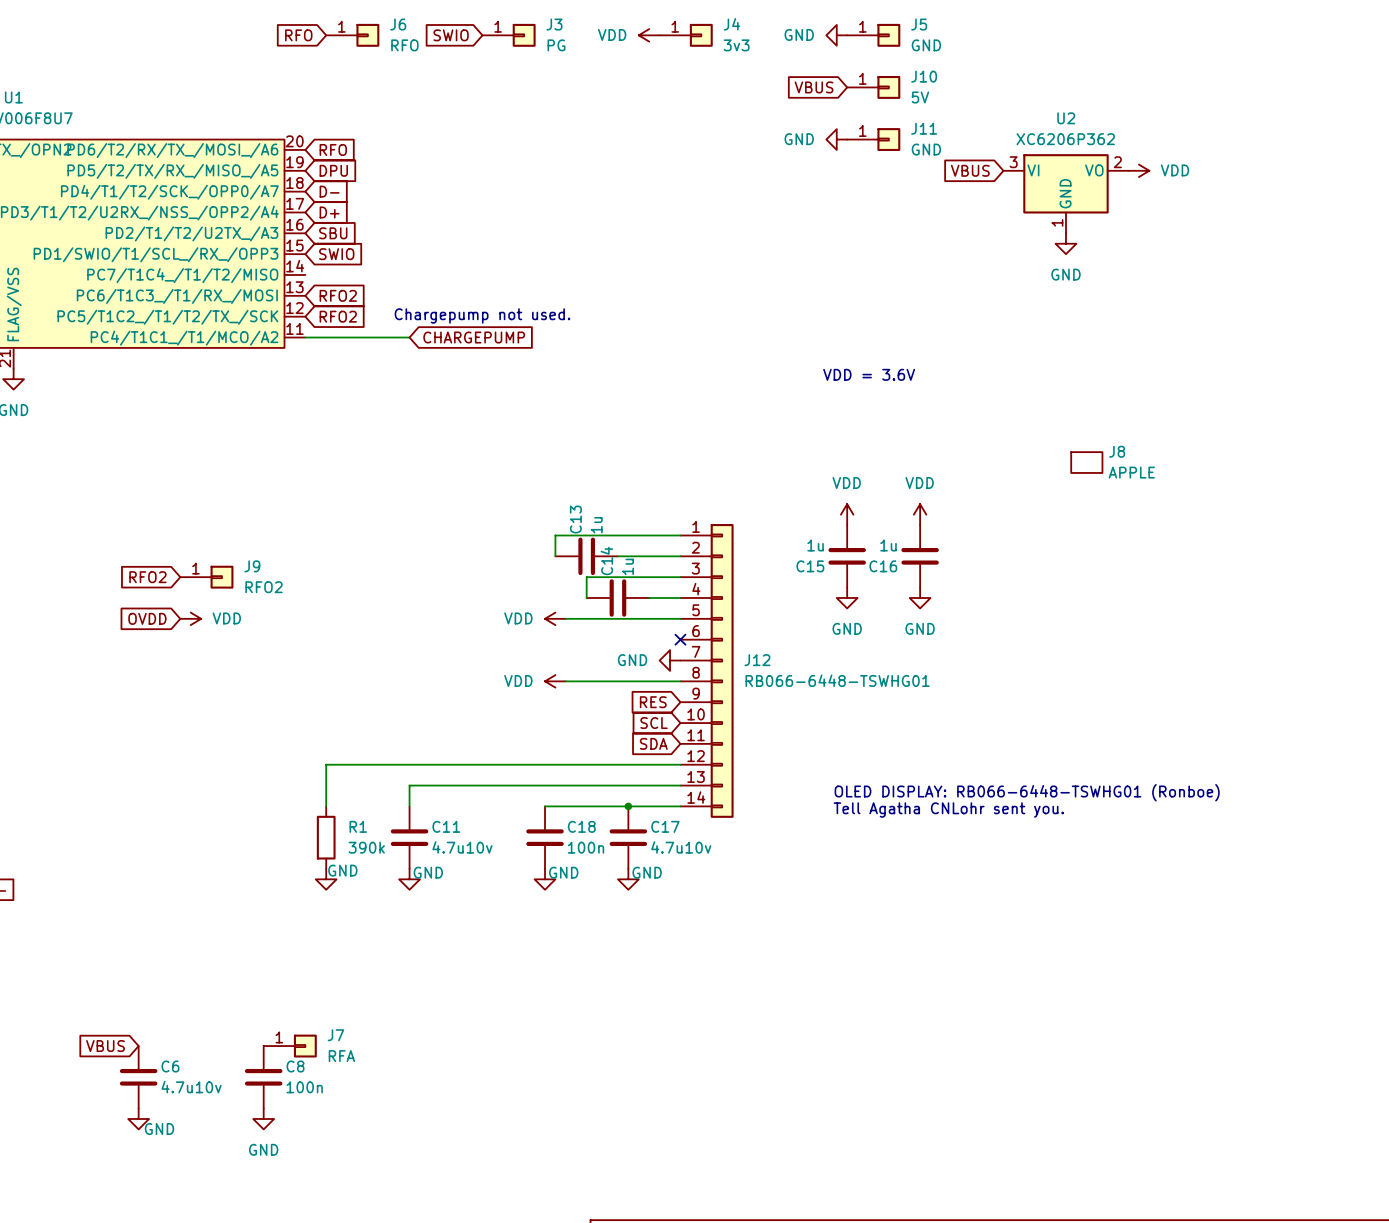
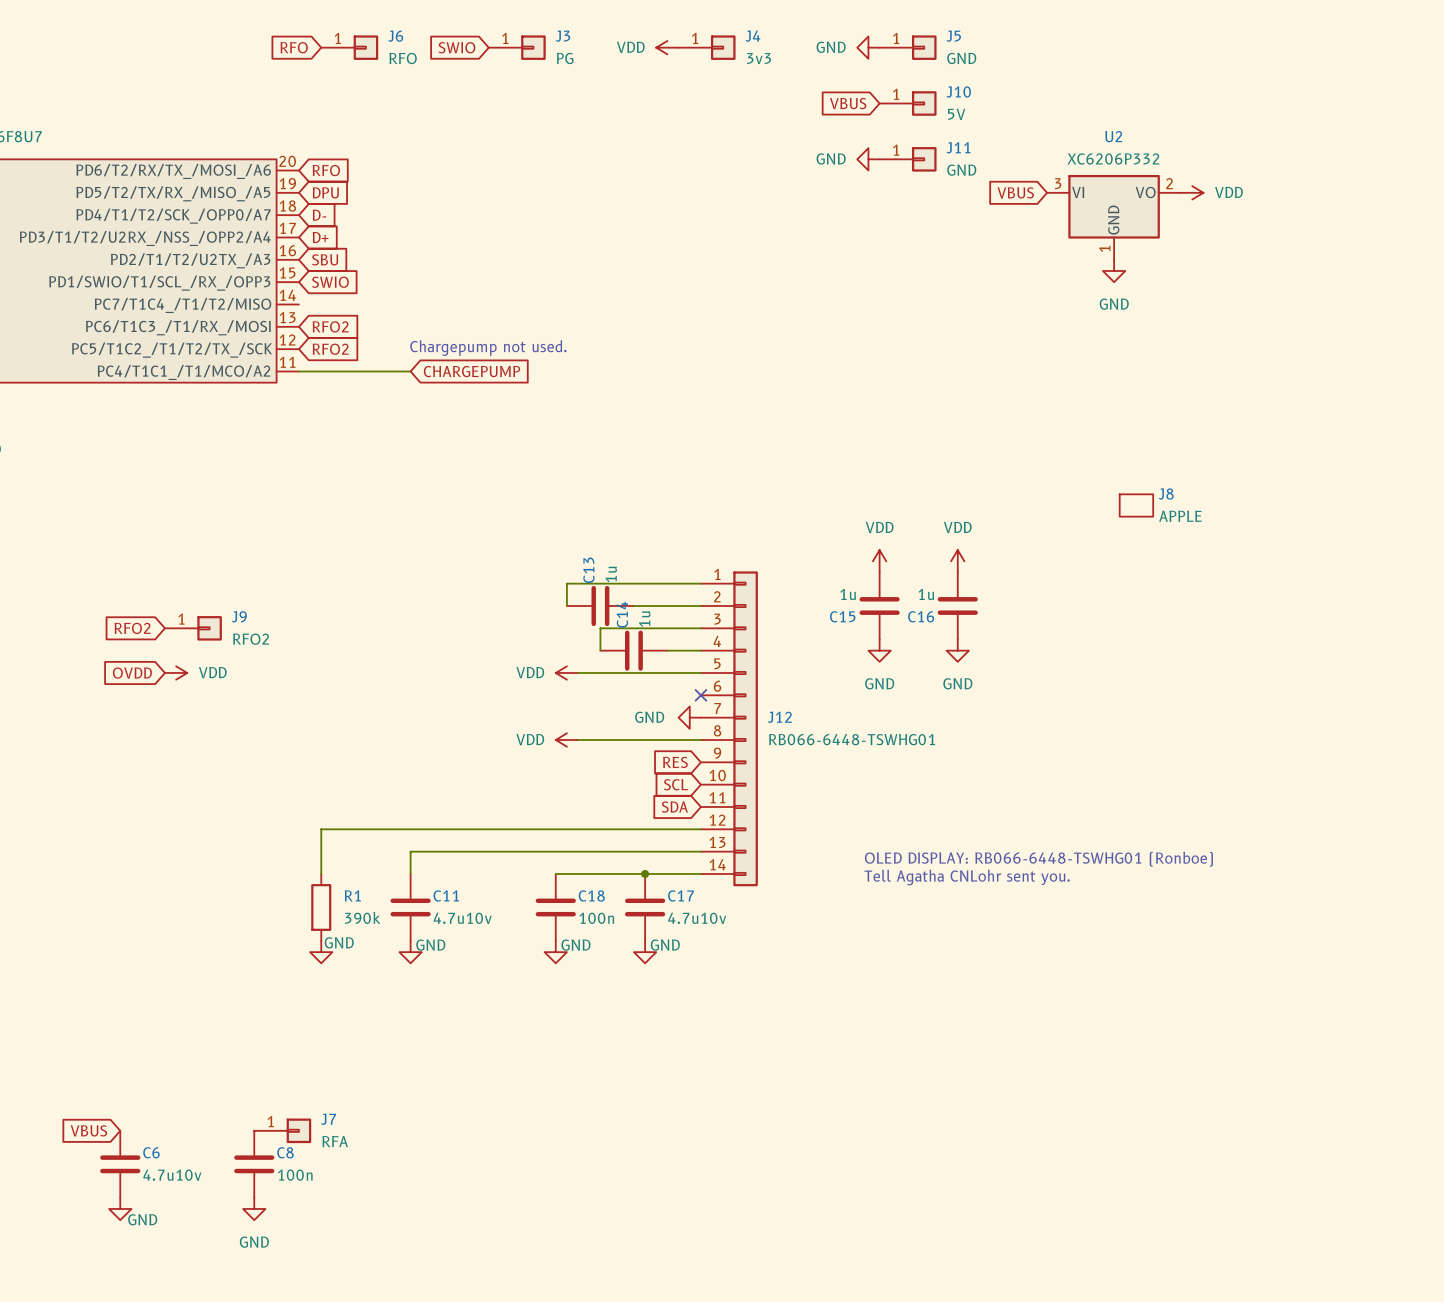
U2 value: XC6206P362 (1065, 139) -> XC6206P332 (1113, 158)
text: VDD = 3.6V (869, 374) -> none

